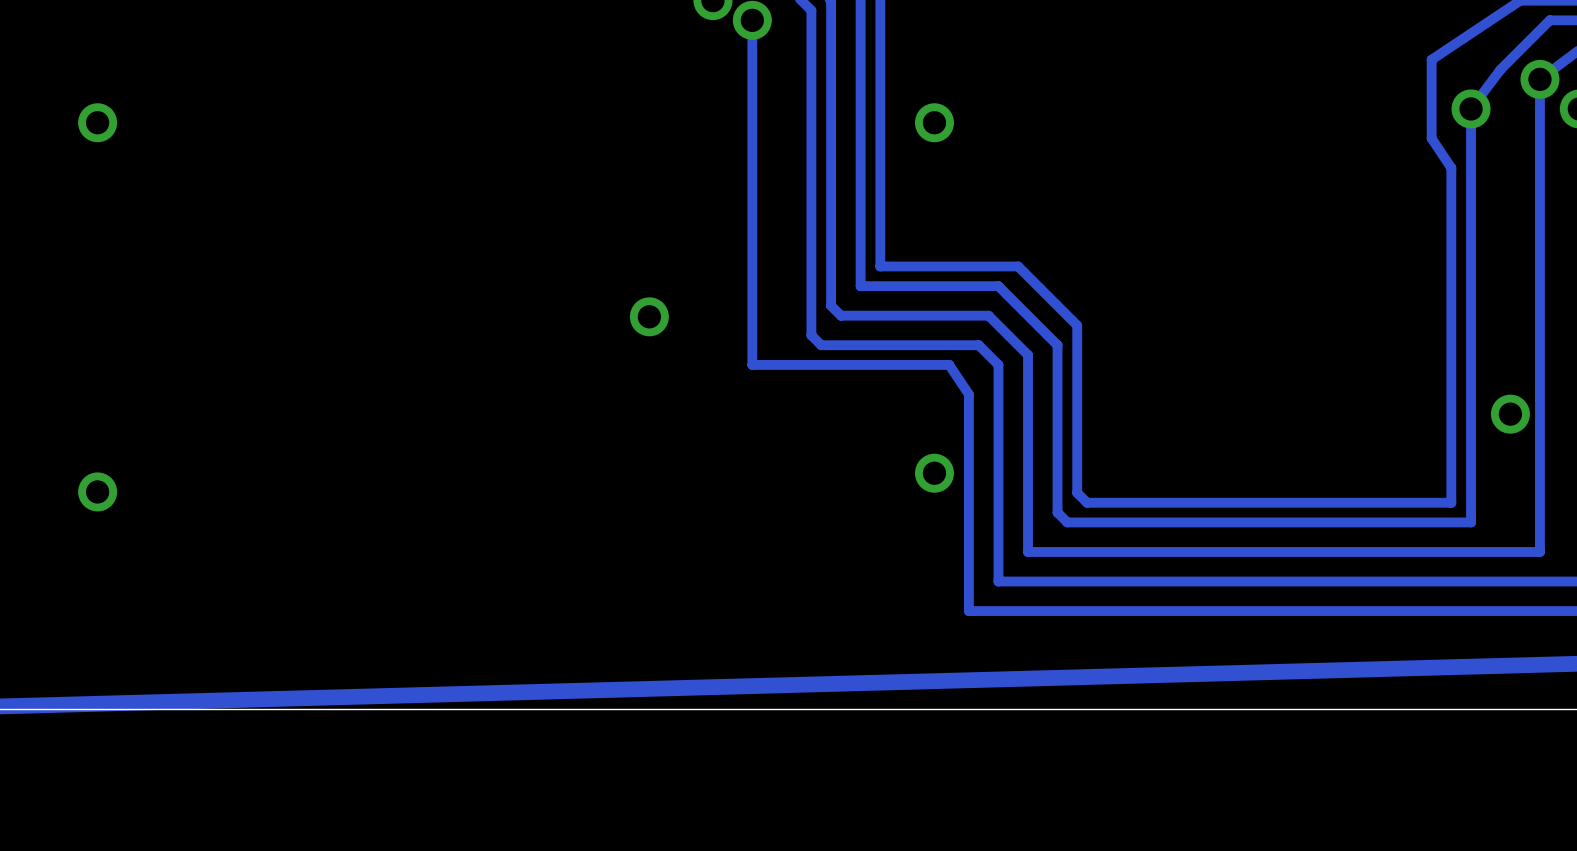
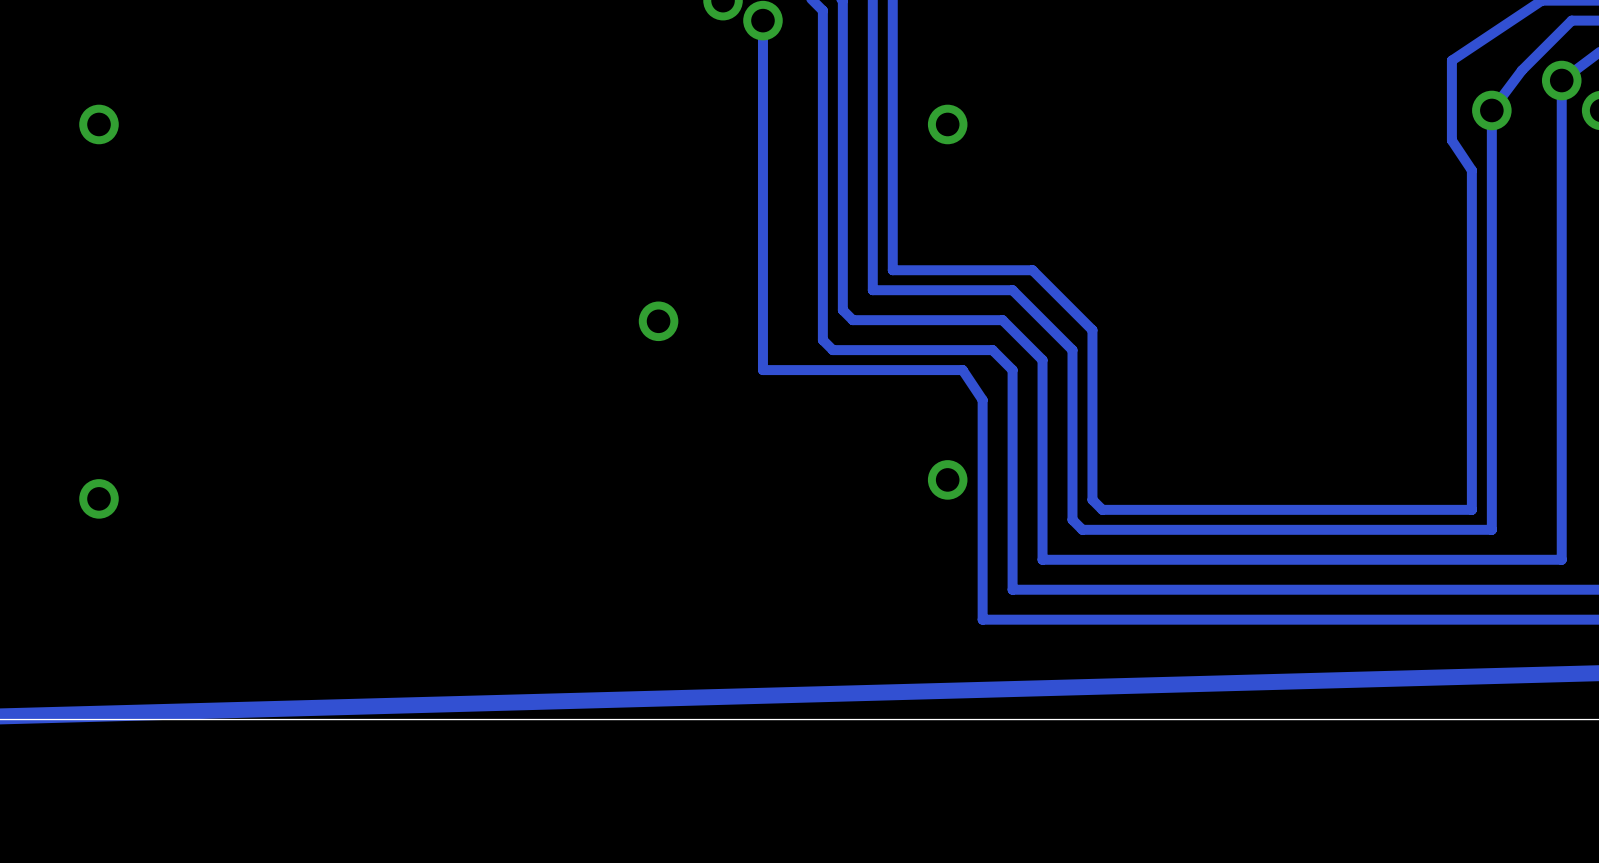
via: (1510, 414) -> none

